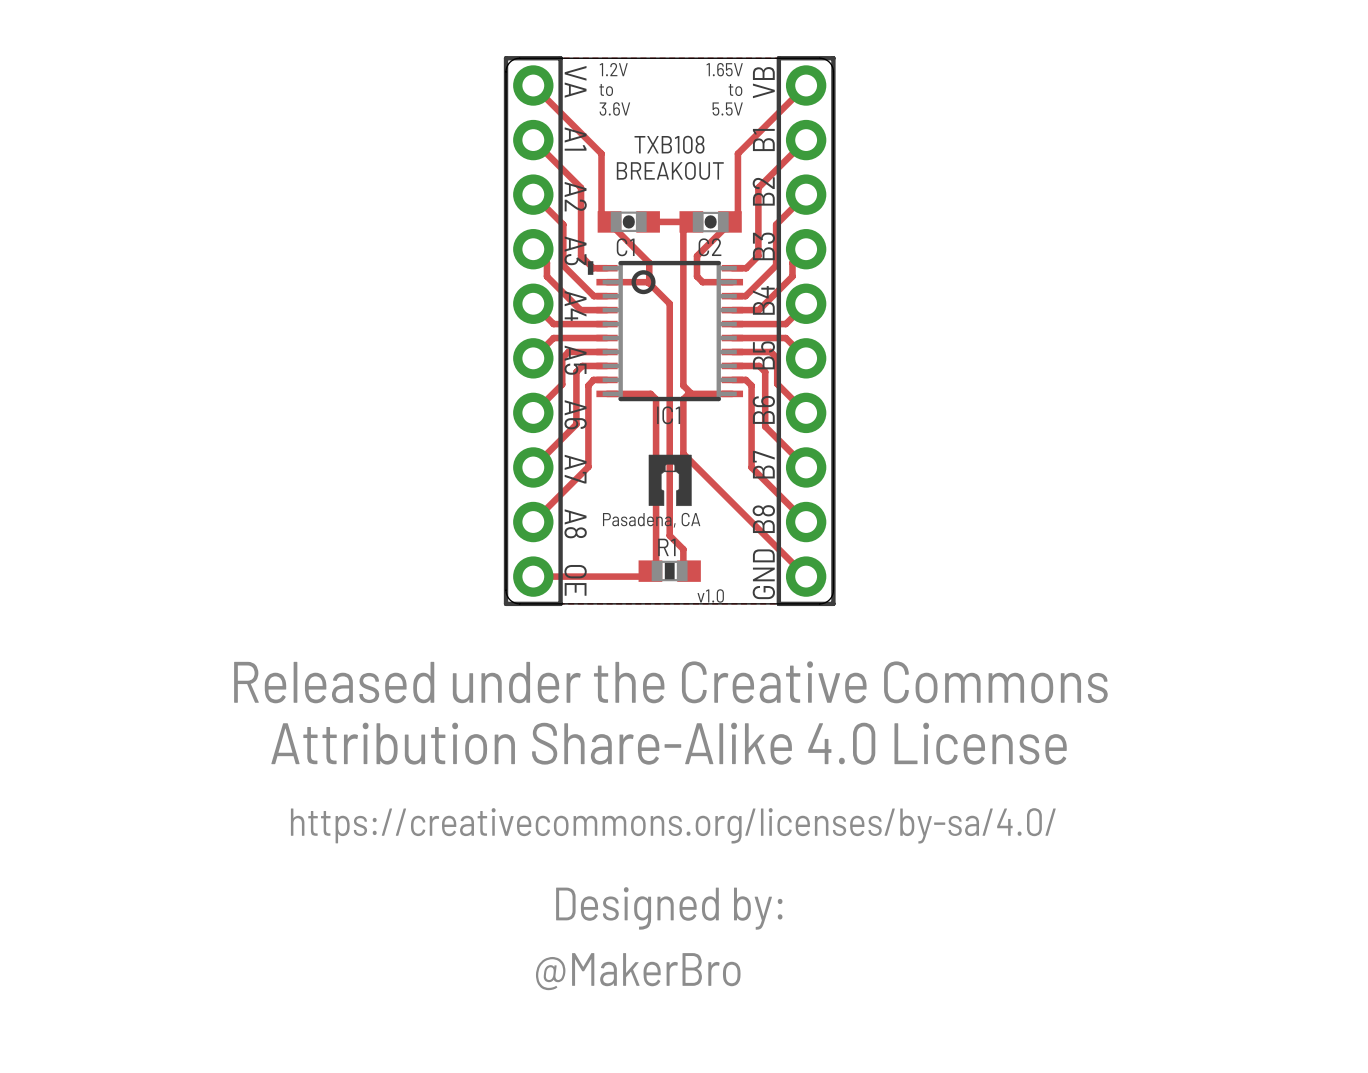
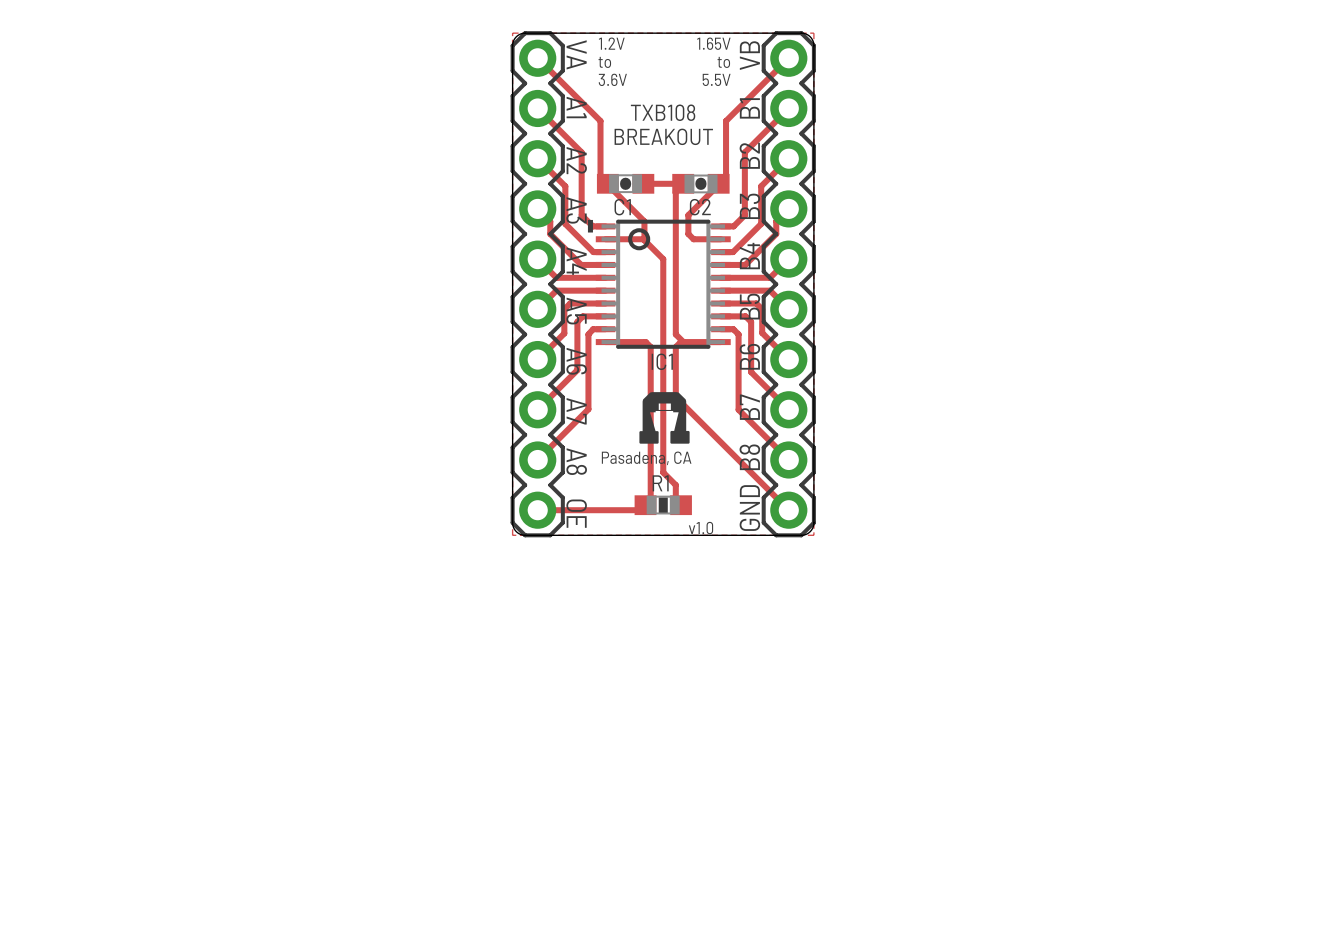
part footprint: [503, 56, 563, 607] -> [510, 31, 565, 538]
part footprint: [776, 56, 836, 607] -> [761, 31, 816, 538]
drawing shape: [648, 454, 692, 507] -> [638, 392, 690, 446]
drawing: [234, 661, 1108, 930] -> none
text: @MakerBro (638, 971) -> none

